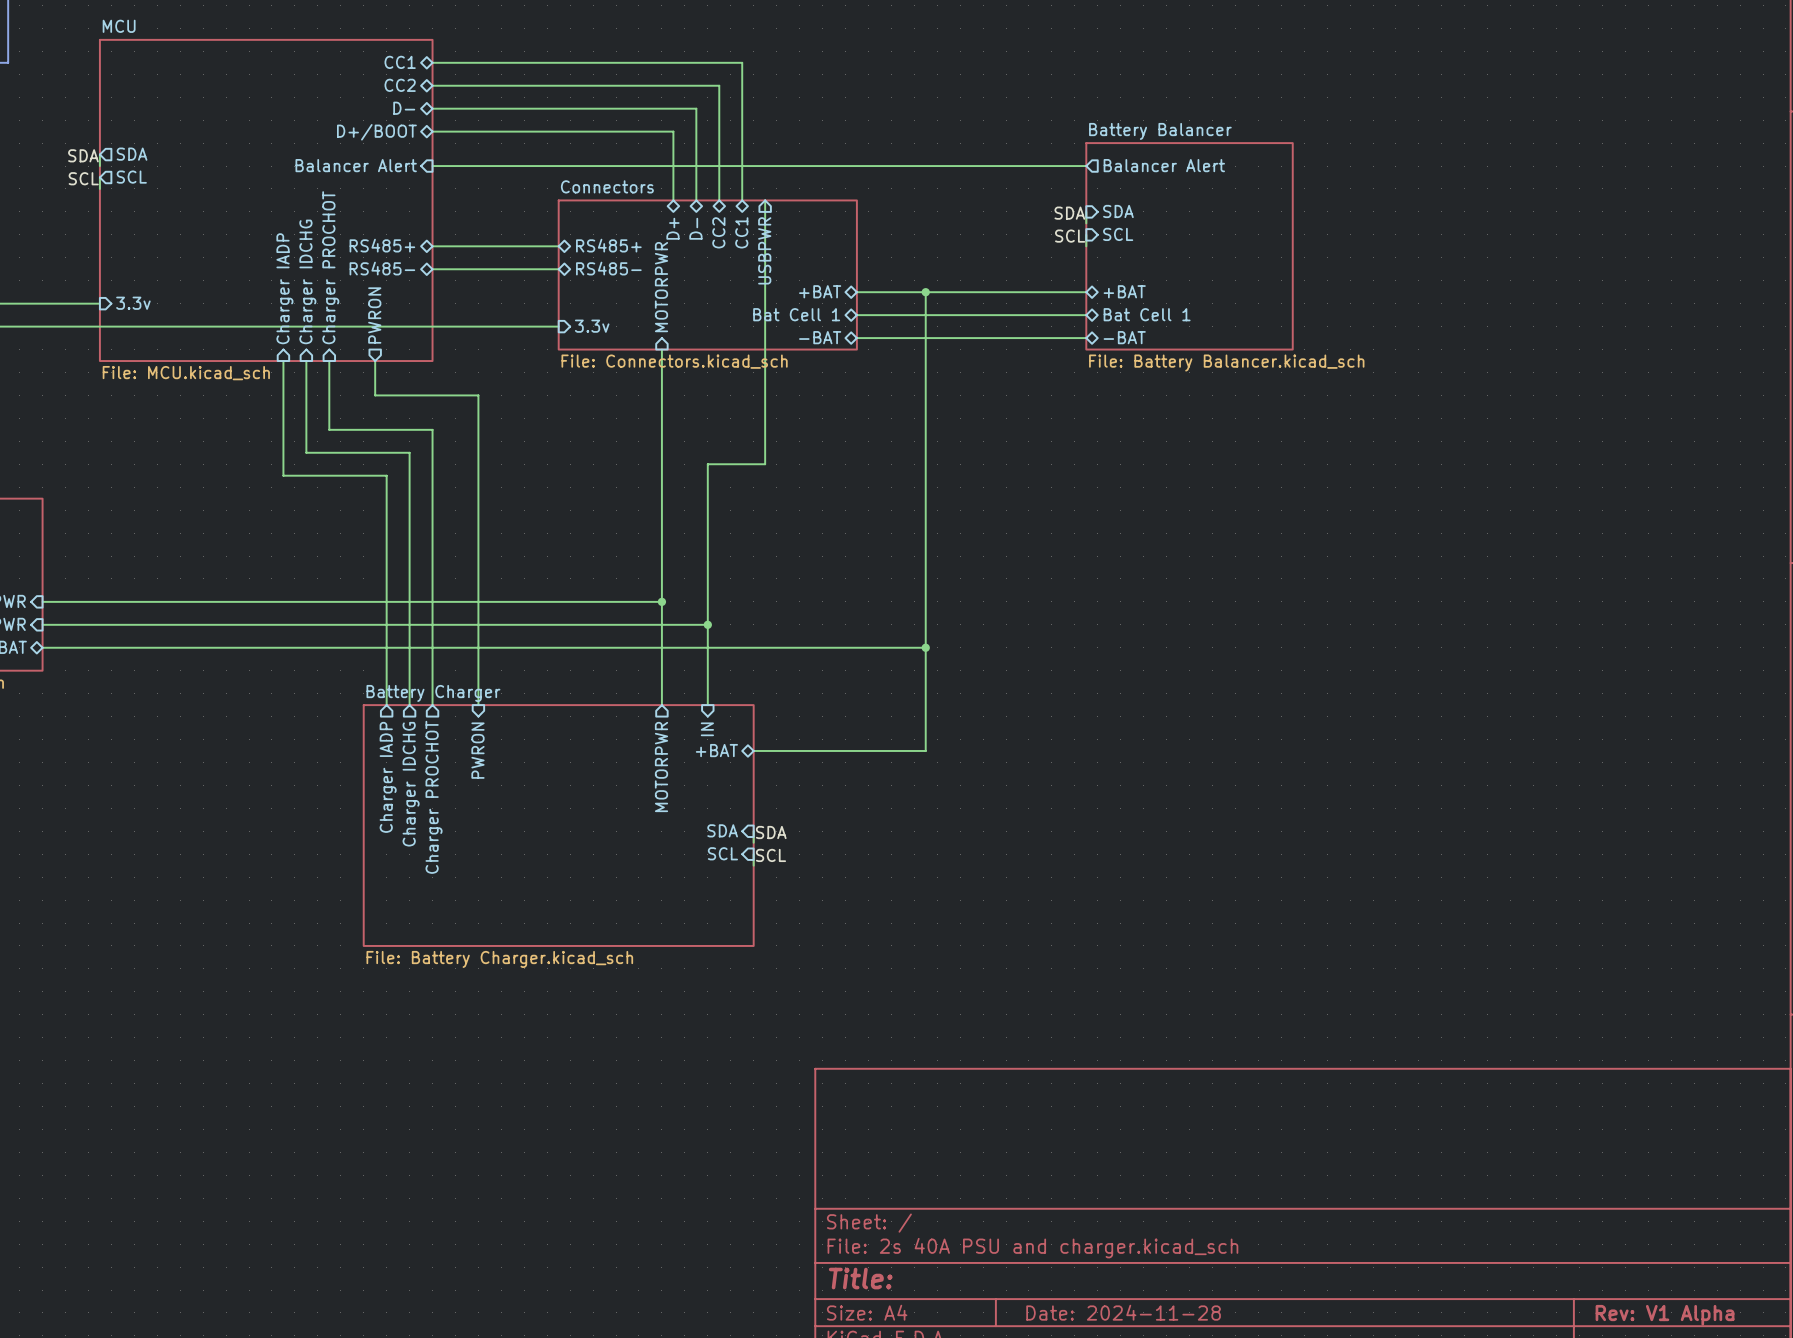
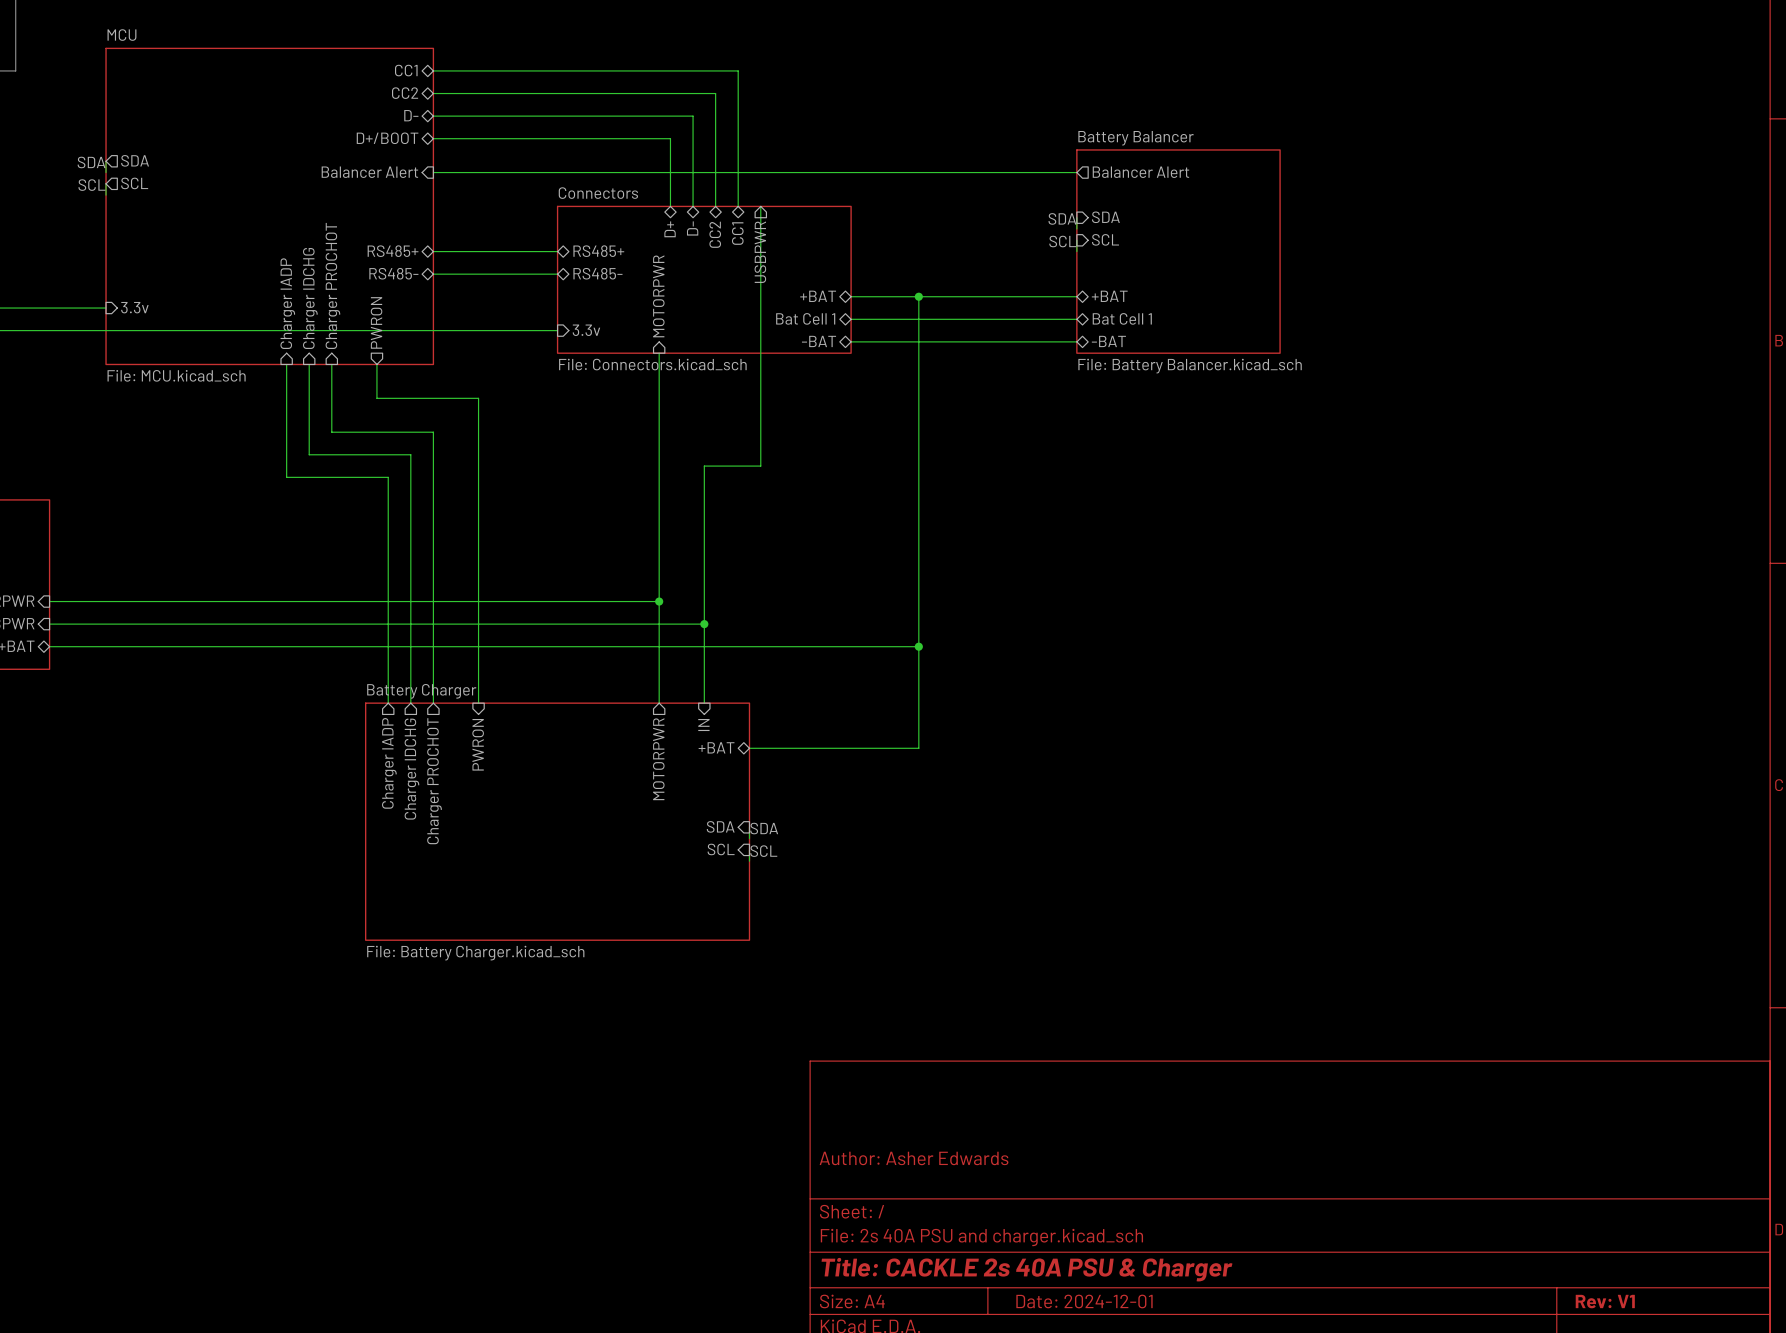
title block: none -> Author: Asher Edwards (914, 1158)
title block: Title: (860, 1278) -> Title: CACKLE 2s 40A PSU & Charger (1027, 1269)
title block: Date: 2024-11-28 (1123, 1312) -> Date: 2024-12-01 (1084, 1301)
title block: Rev: V1 Alpha (1665, 1315) -> Rev: V1 (1605, 1301)

